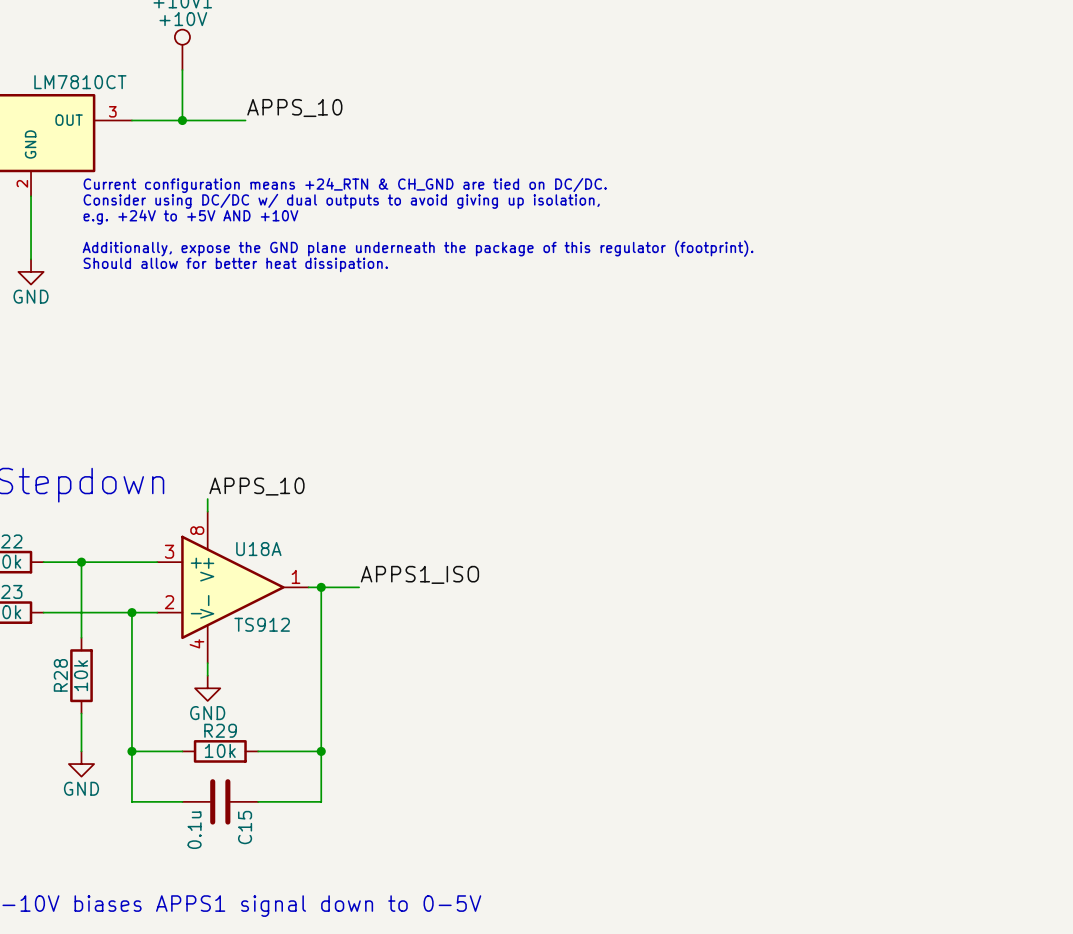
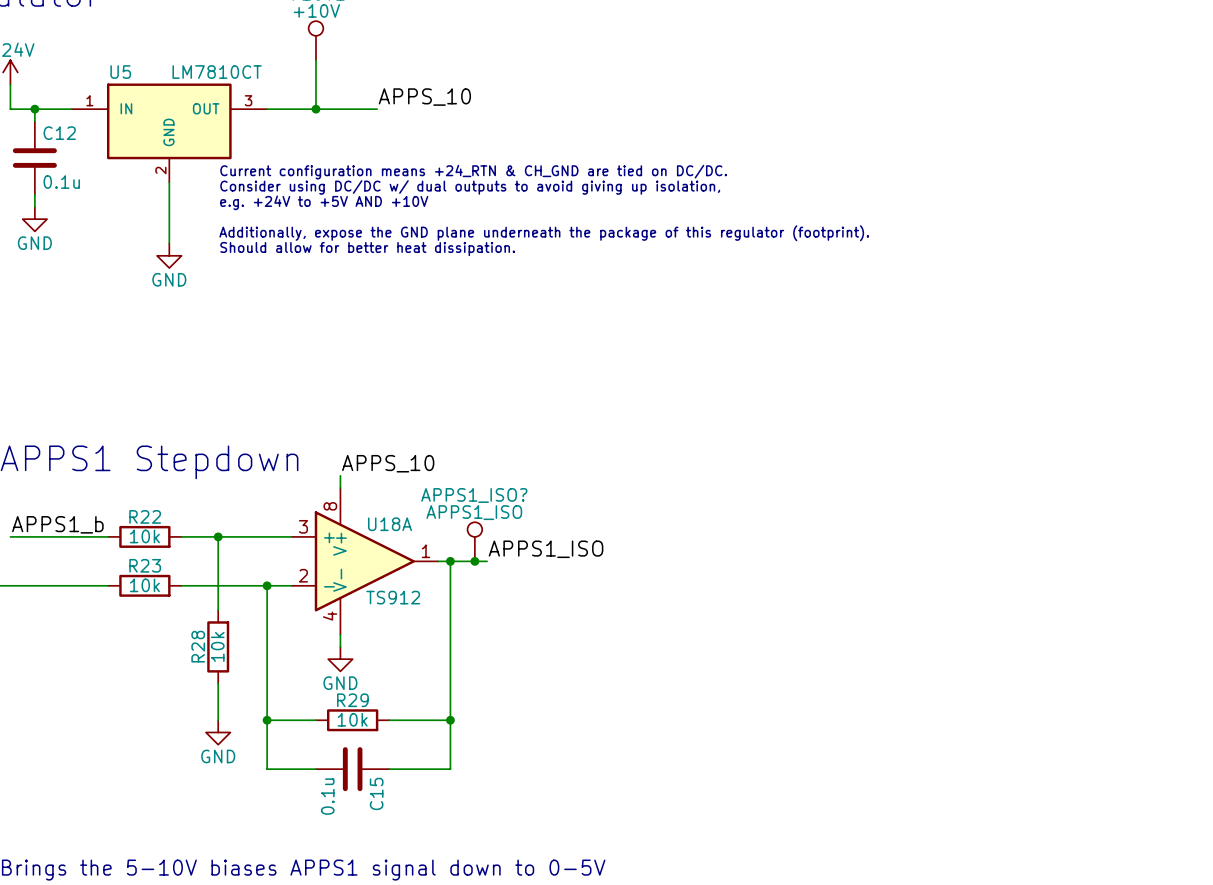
APPS1_ISO?: none -> APPS1_ISO (474, 541)
junction: none -> (474, 561)

